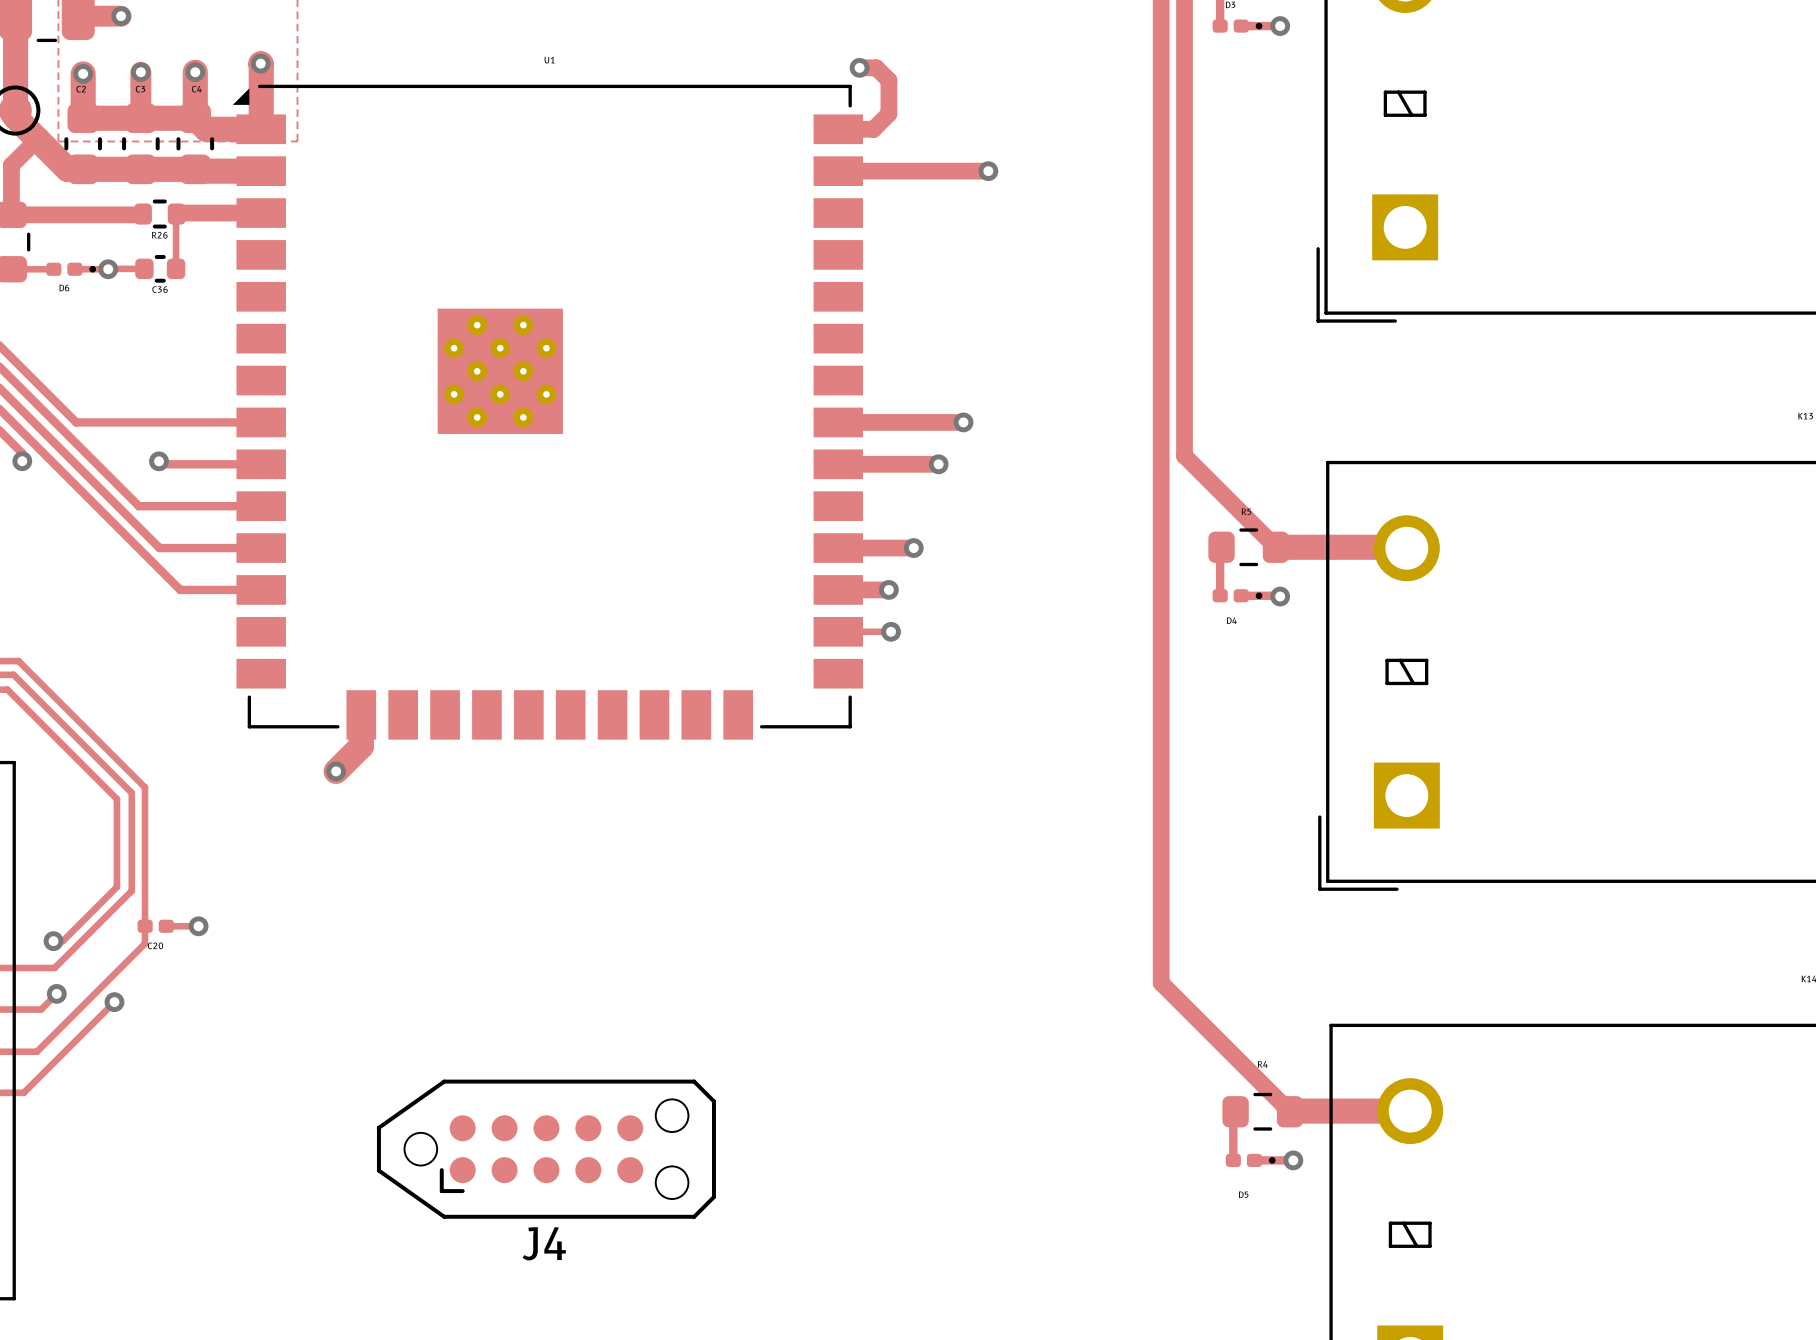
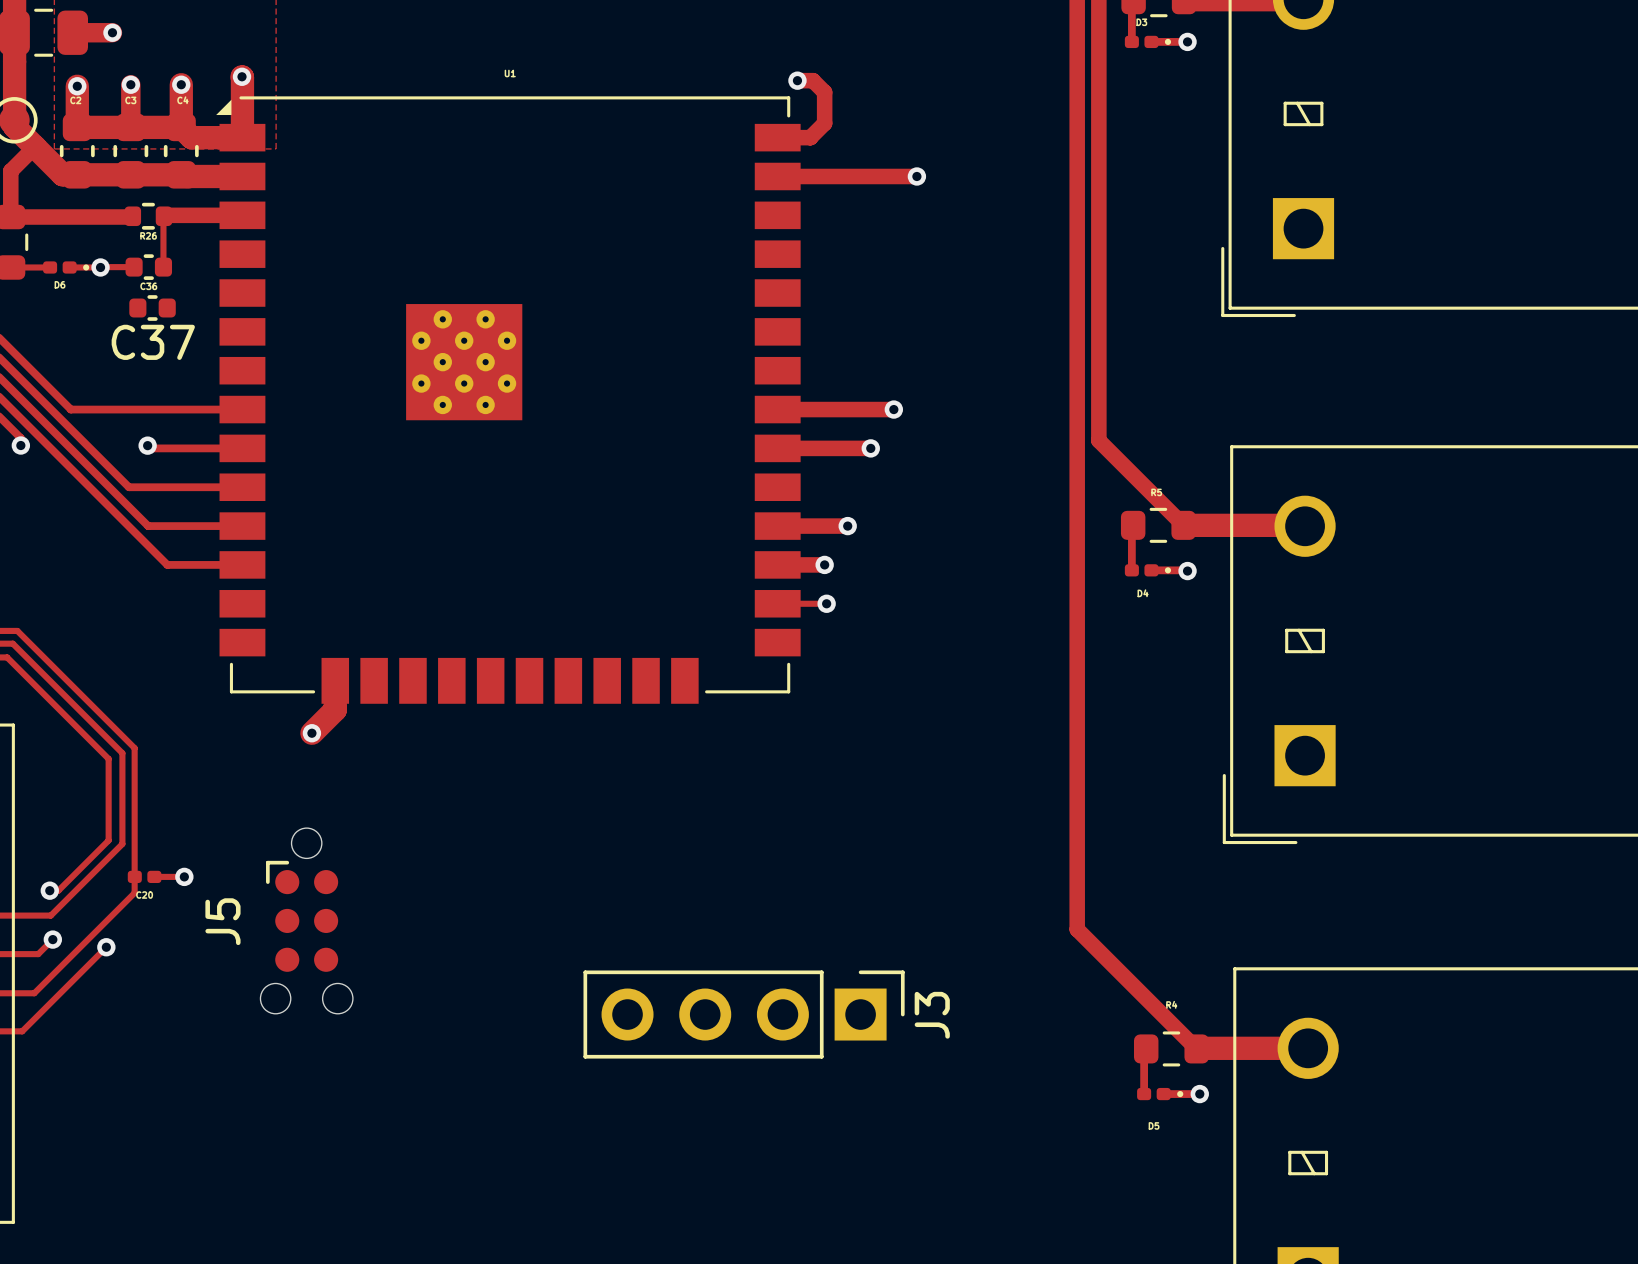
C37: none -> (152, 308)
J5: none -> (306, 920)
J3: none -> (744, 1014)
J4: (546, 1149) -> none

